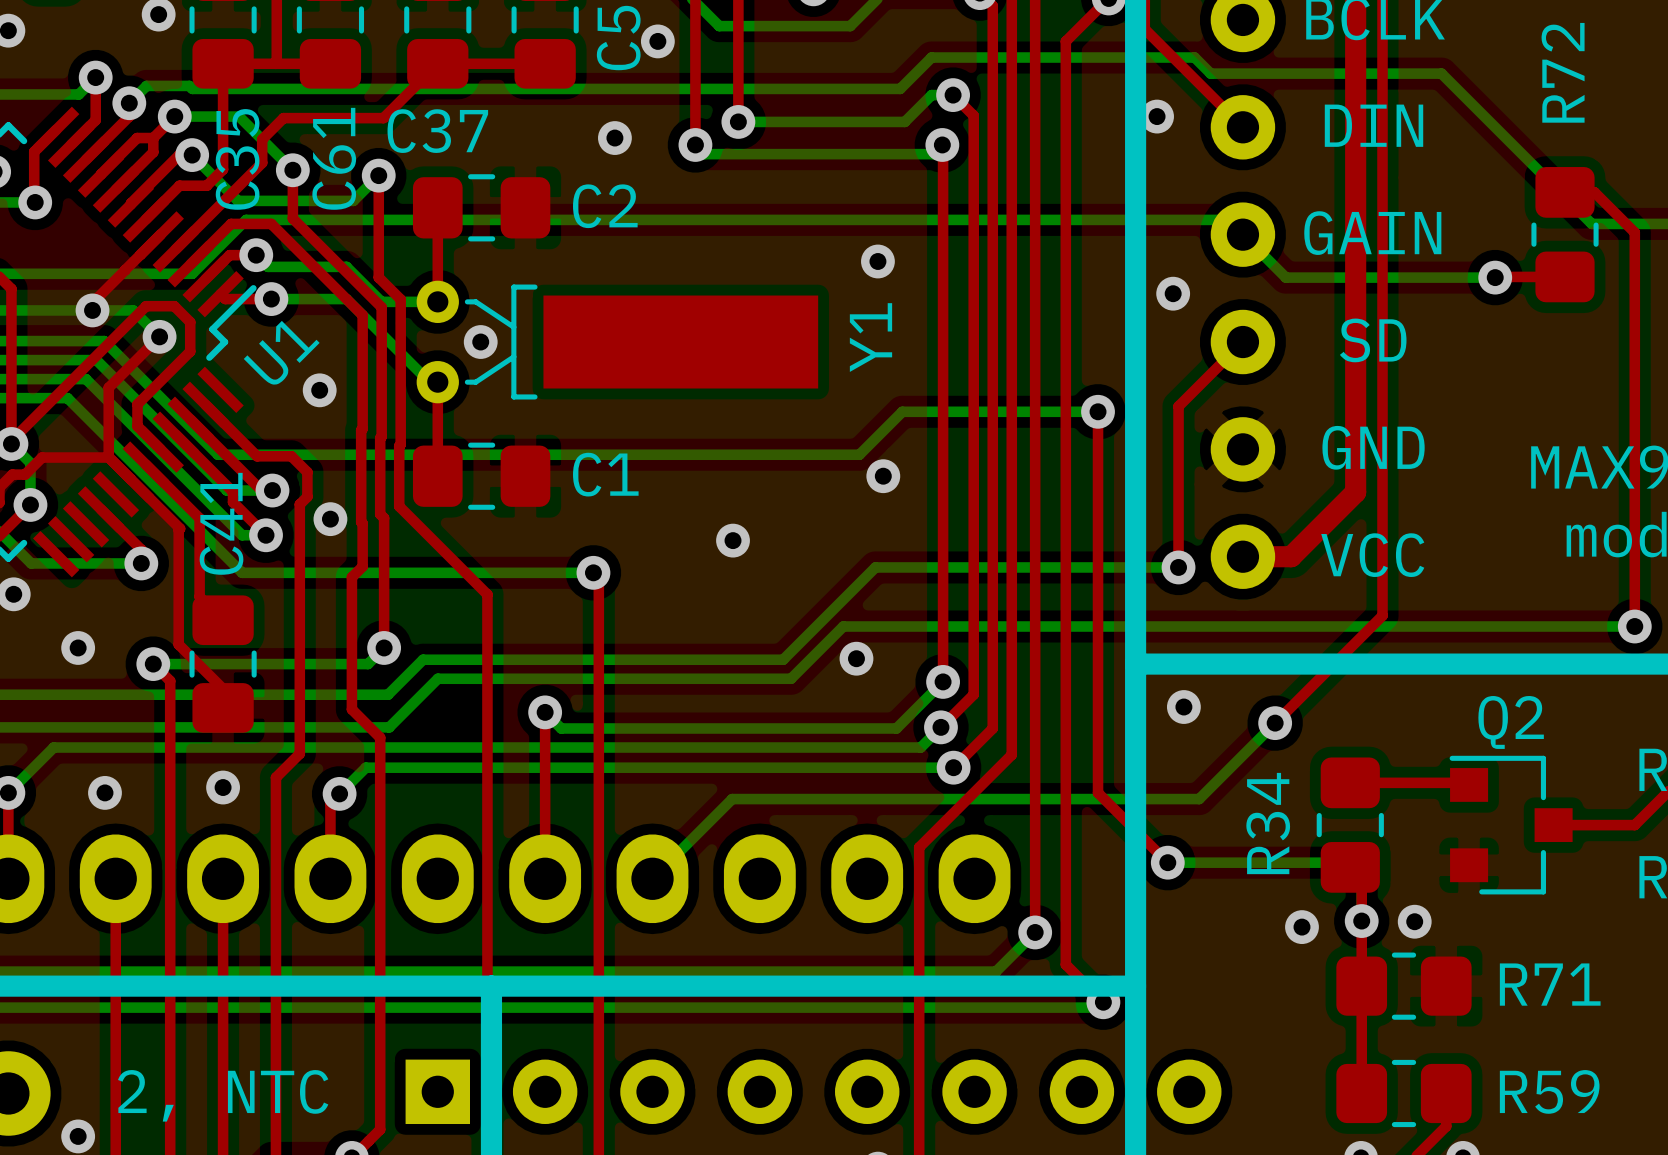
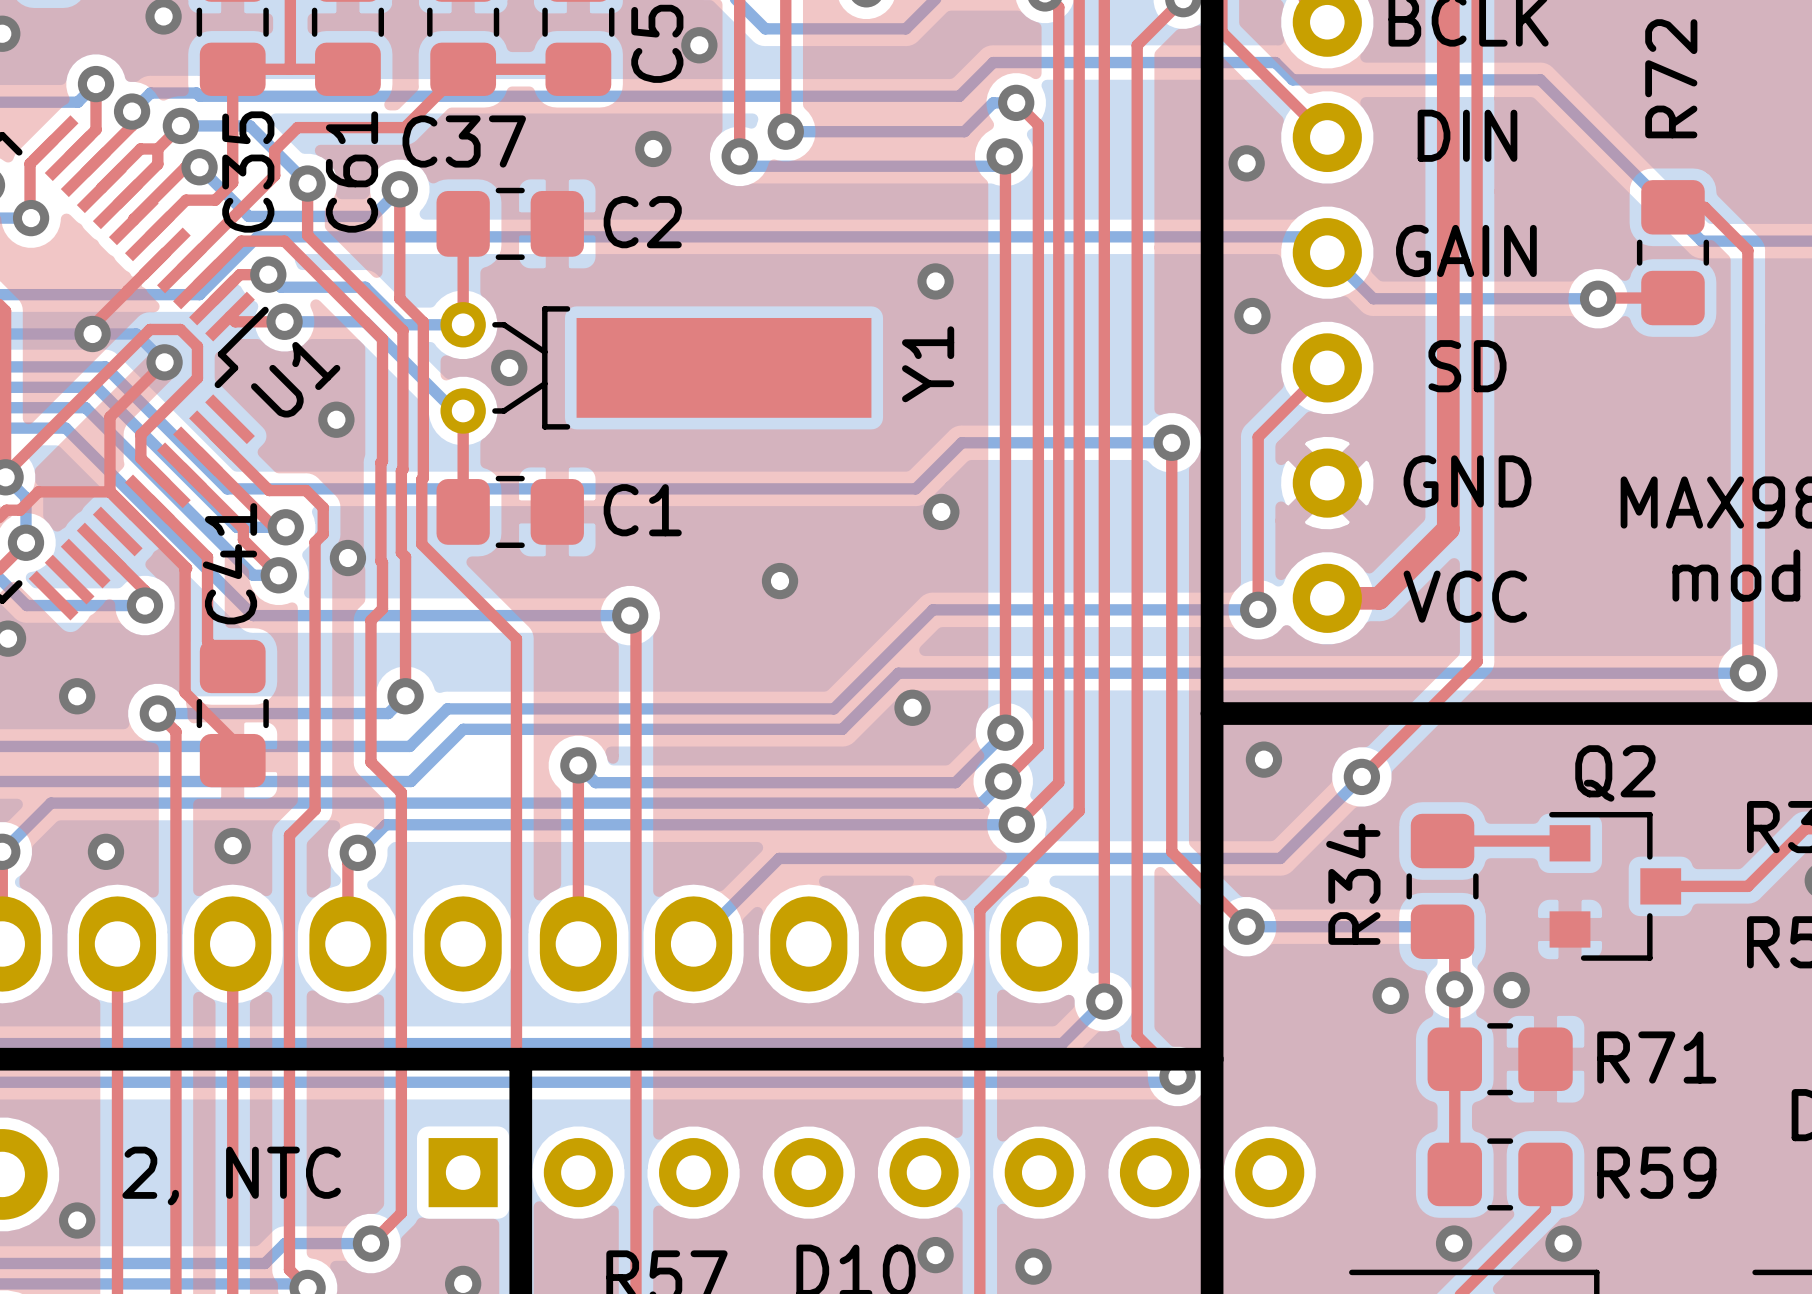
via position: (1157, 116) -> (1246, 163)

